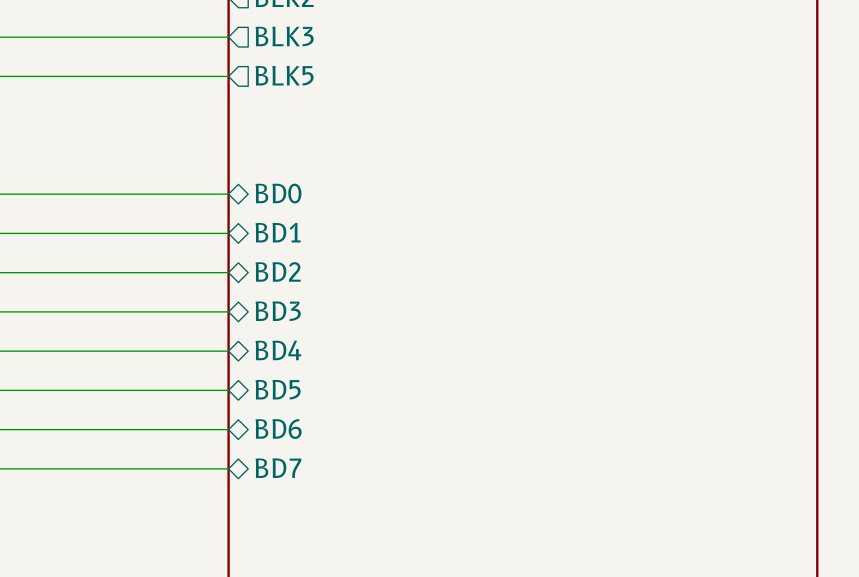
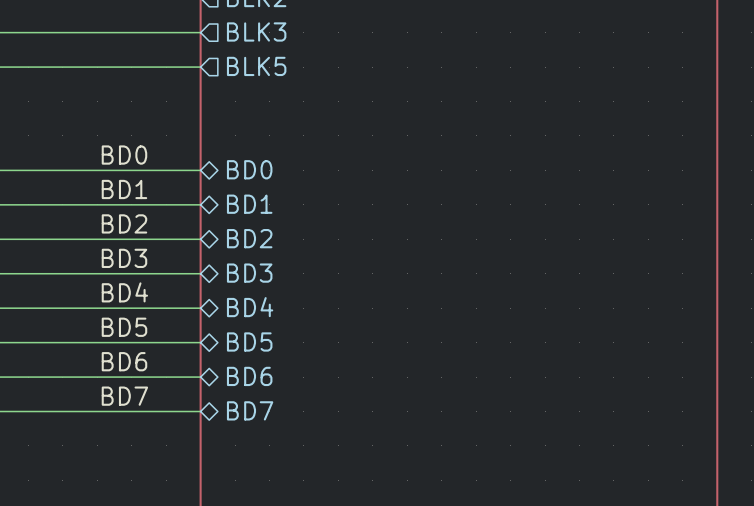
label: none -> BD0 (124, 155)
label: none -> BD1 (124, 189)
label: none -> BD2 (124, 223)
label: none -> BD3 (124, 258)
label: none -> BD4 (124, 292)
label: none -> BD5 (124, 327)
label: none -> BD6 (124, 361)
label: none -> BD7 (124, 396)

